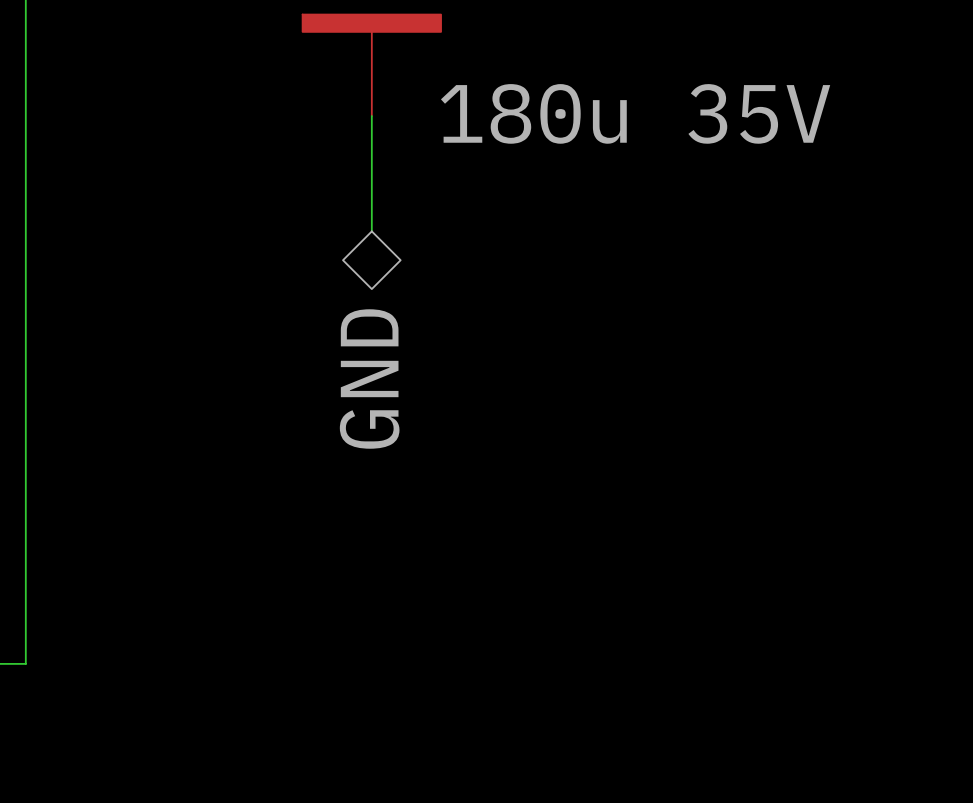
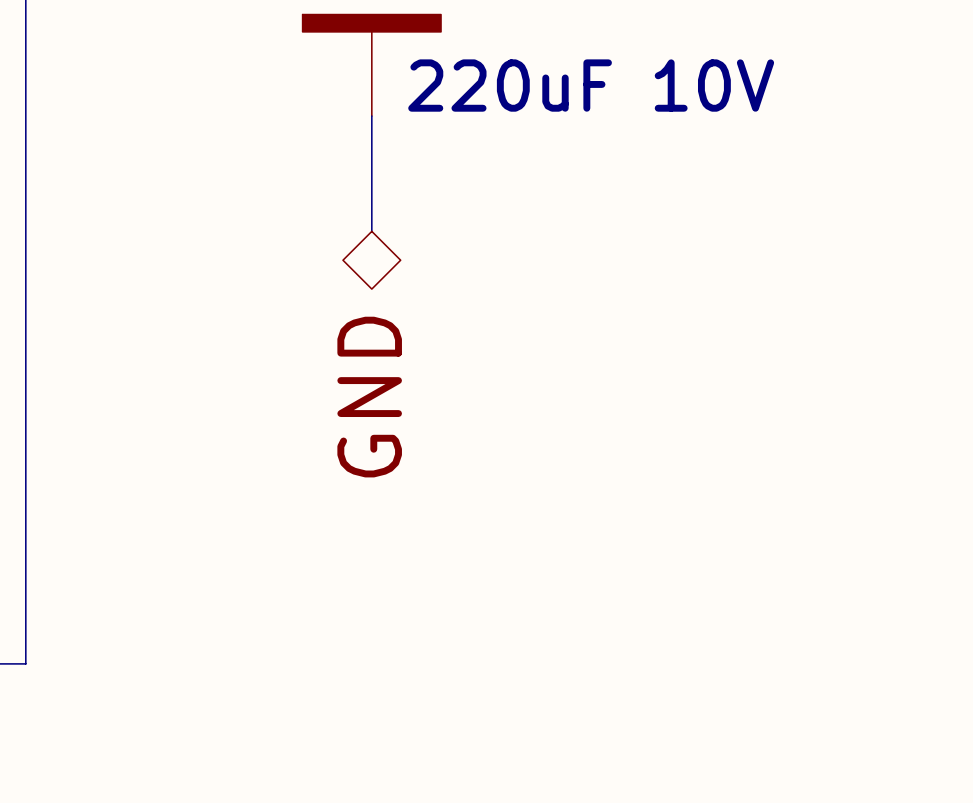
part value: 180u 35V (635, 113) -> 220uF 10V (591, 85)

